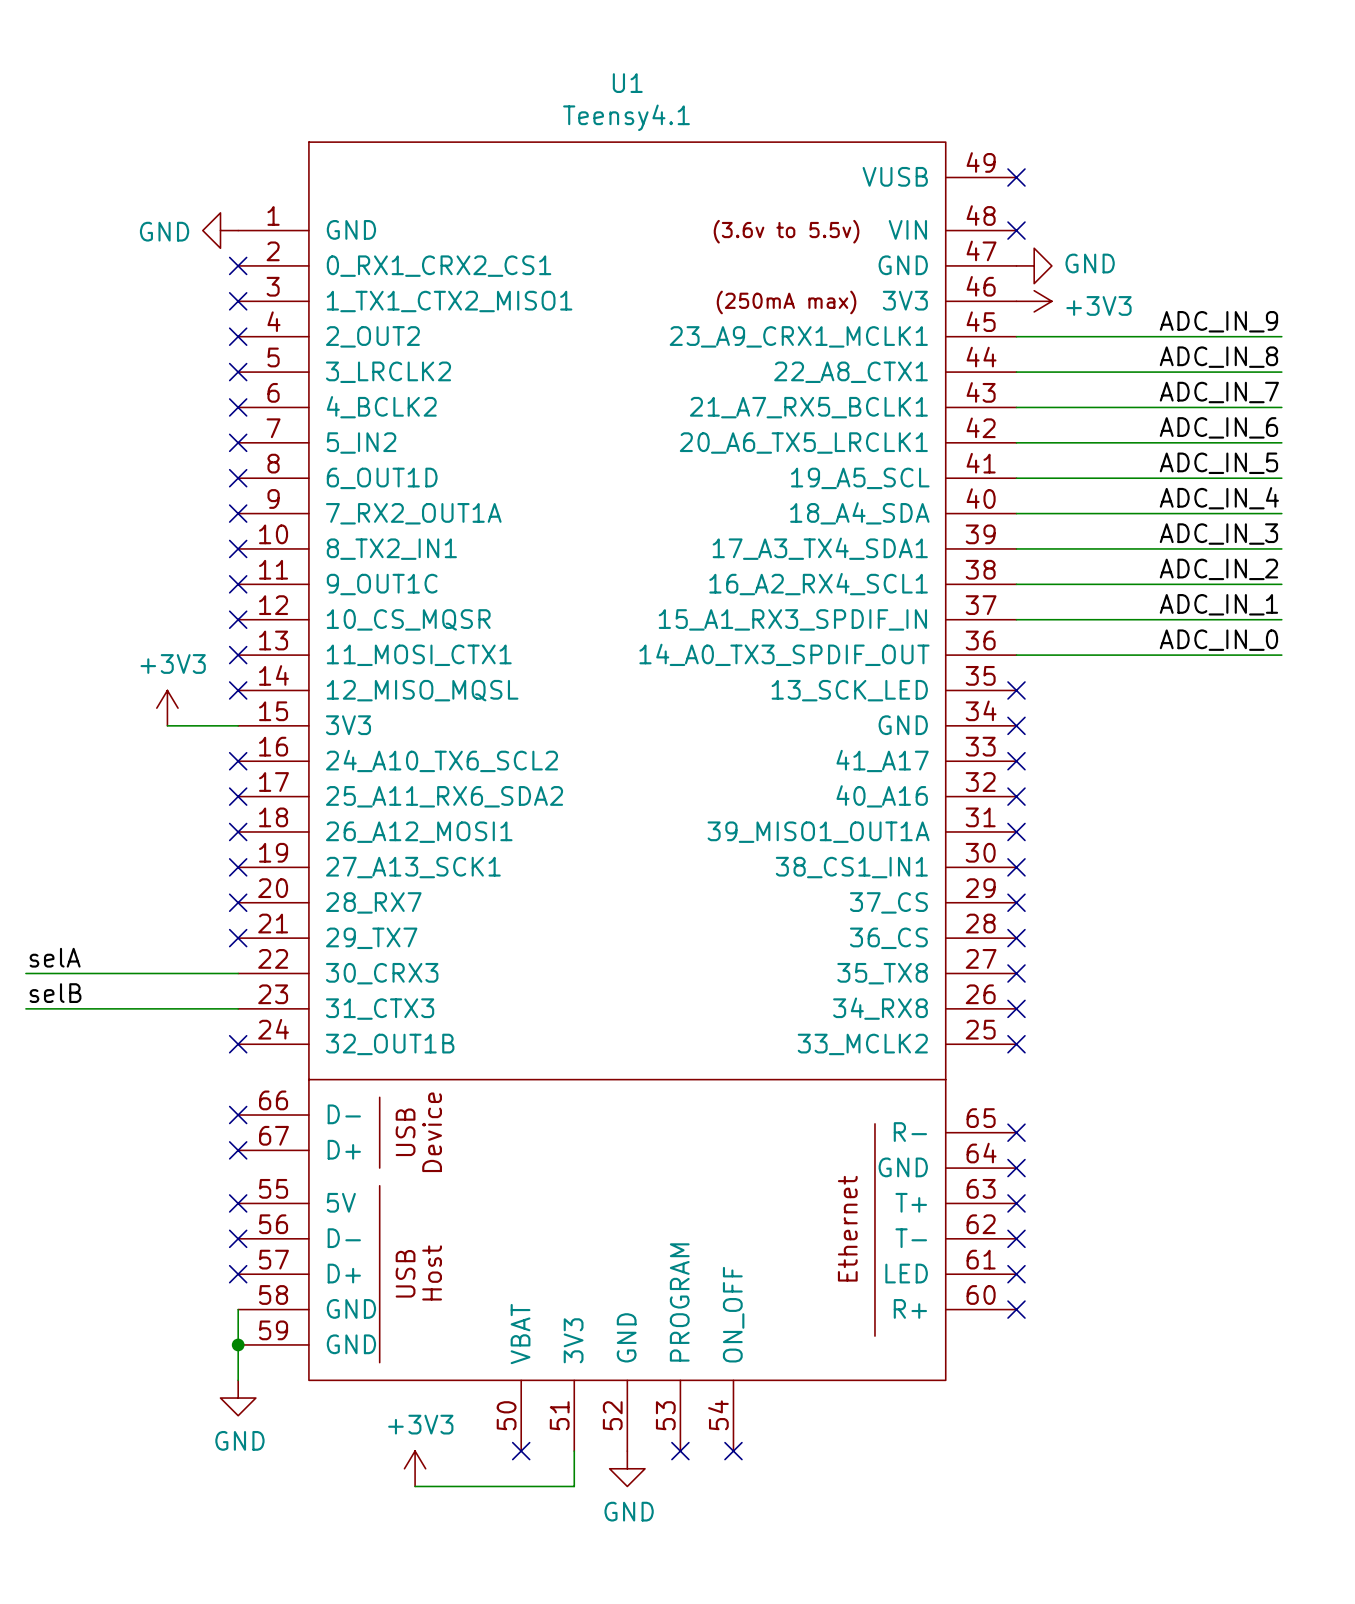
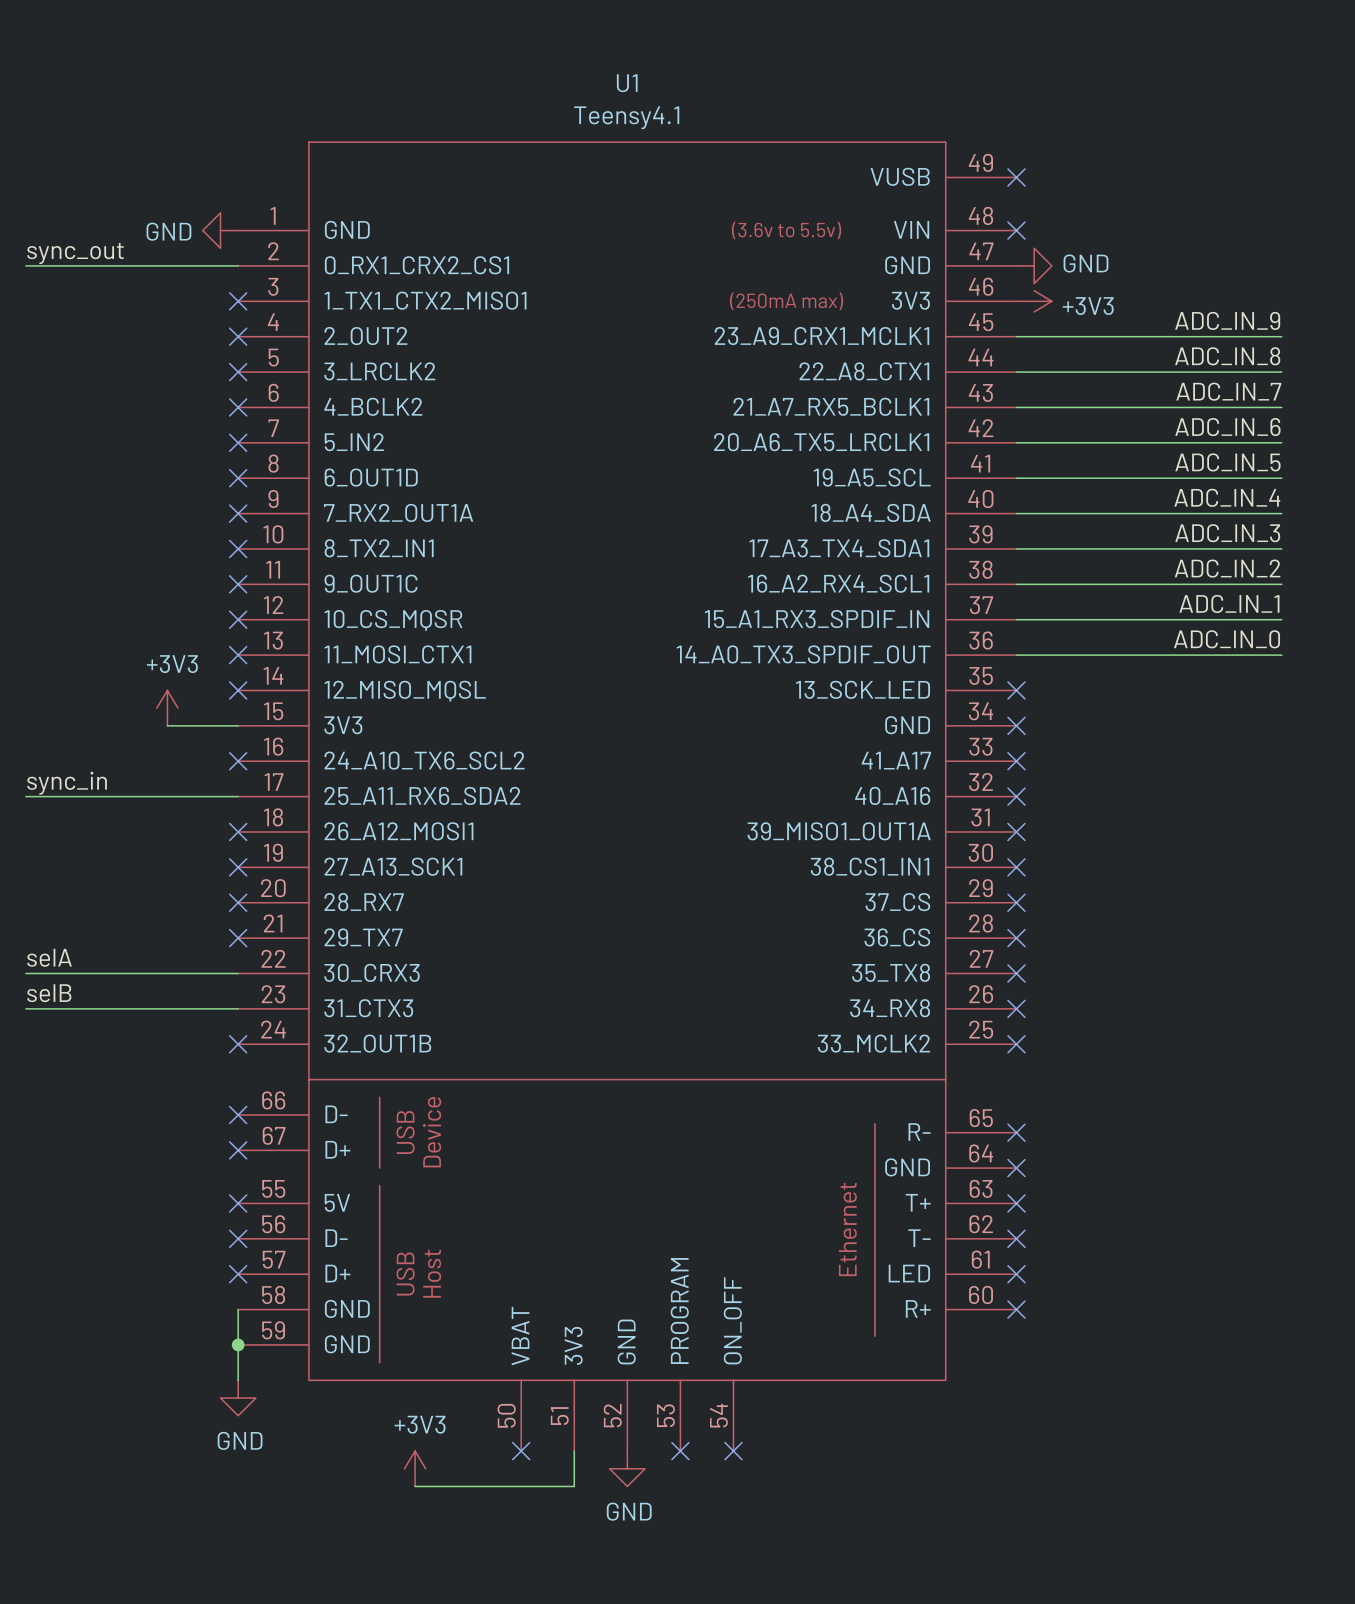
label: none -> sync_out (75, 253)
wire: none -> (25, 265) (238, 265)
no-connect mark: (238, 265) -> none
label: none -> sync_in (67, 783)
wire: none -> (25, 796) (238, 796)
no-connect mark: (238, 796) -> none

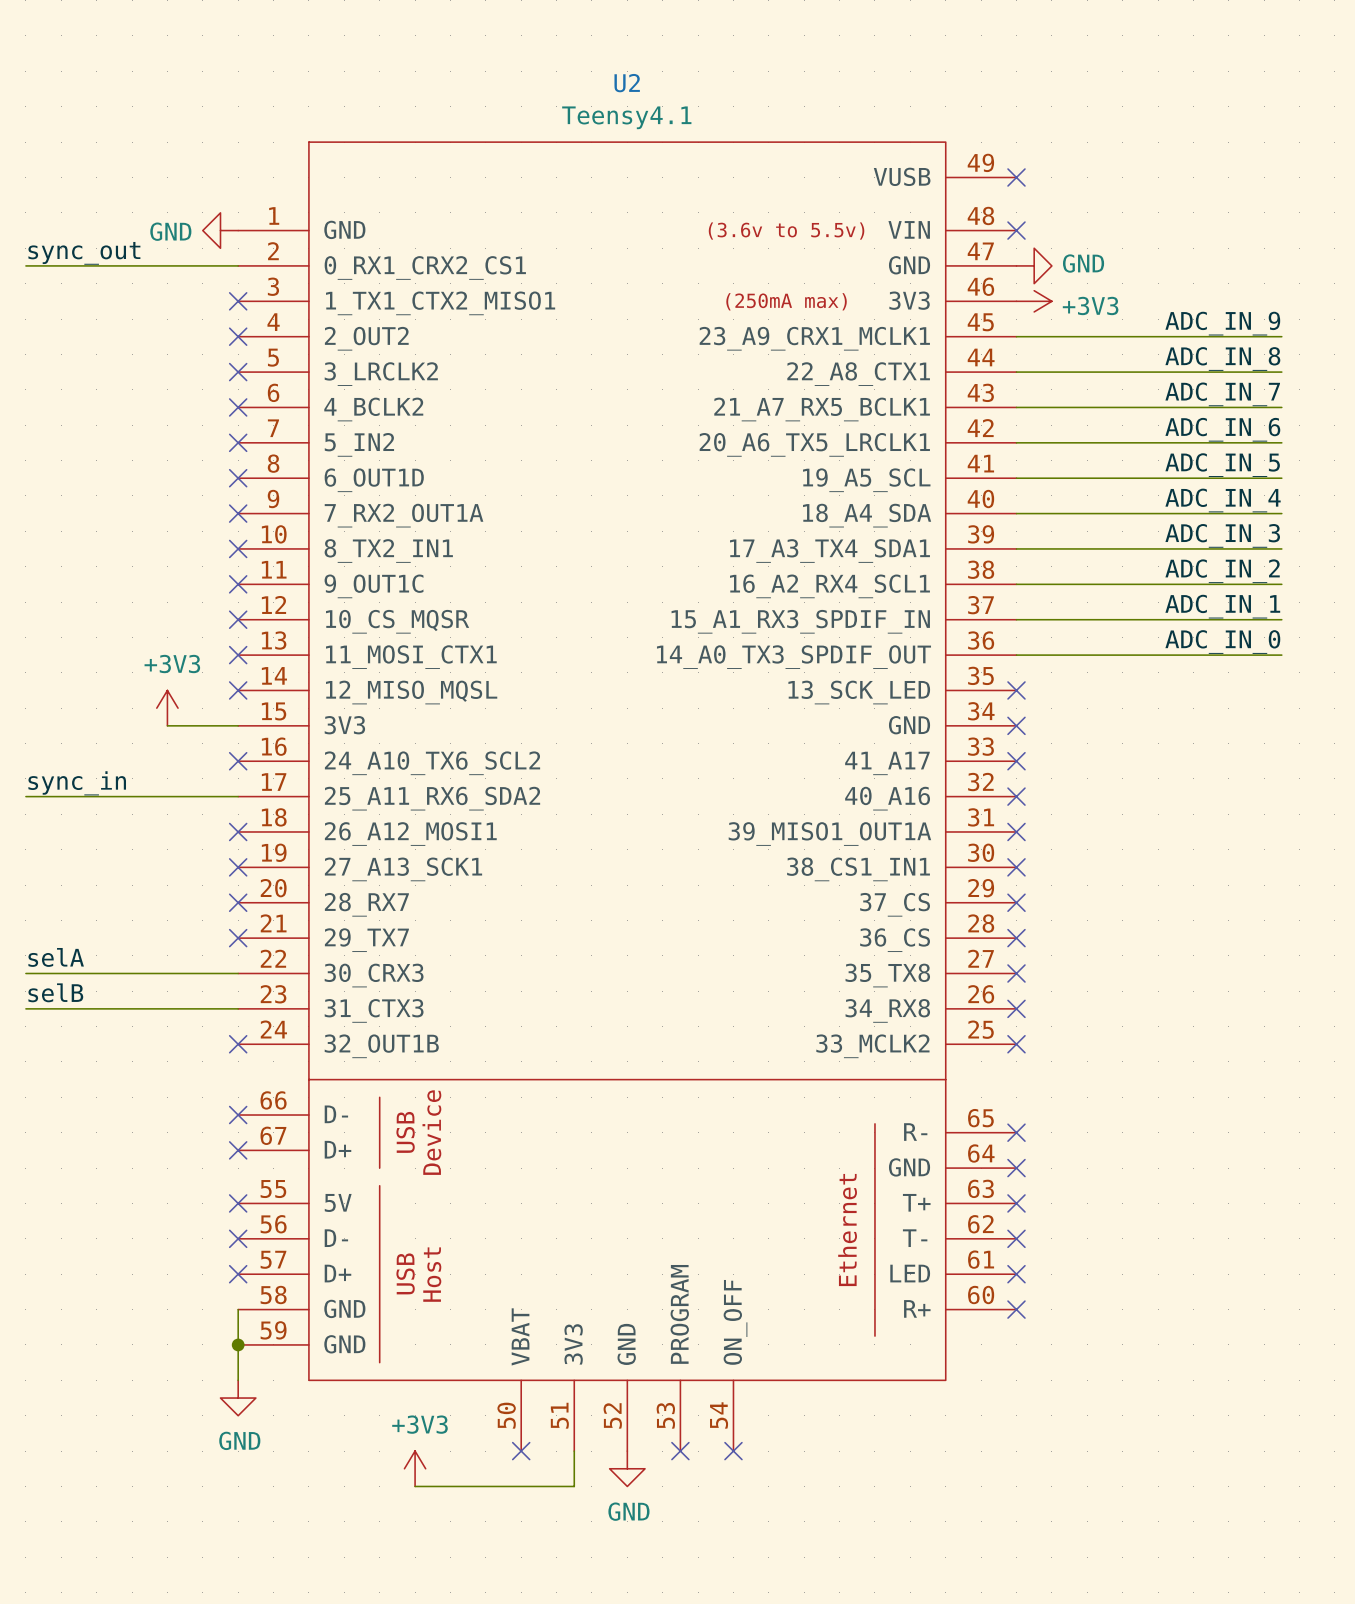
U1 name: U1 (627, 83) -> U2 (627, 83)

